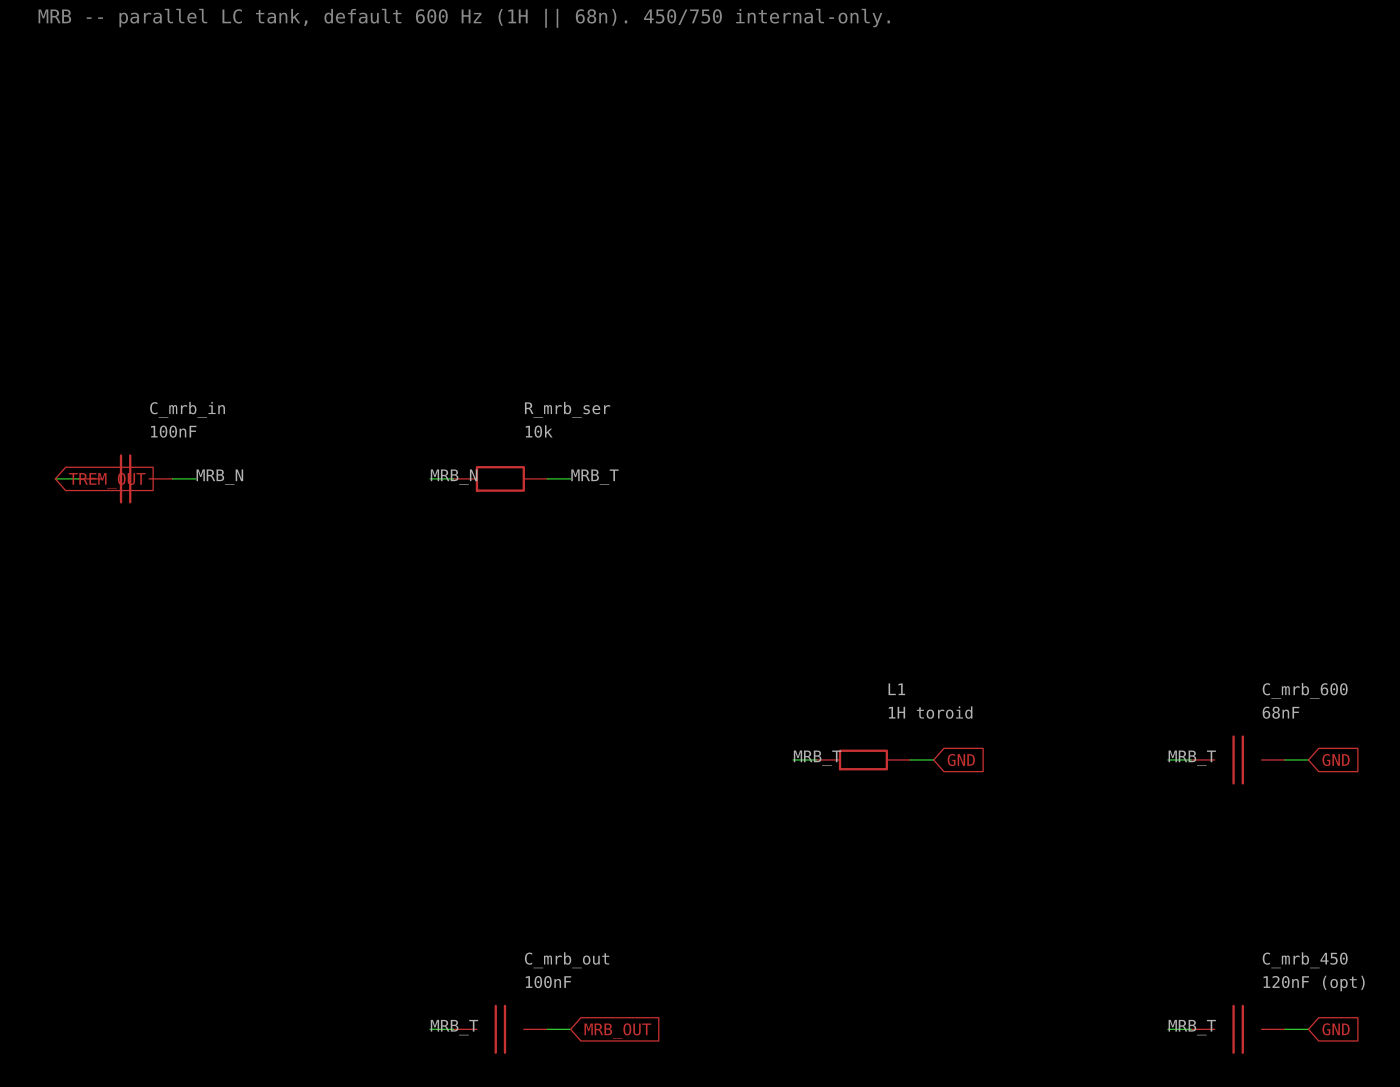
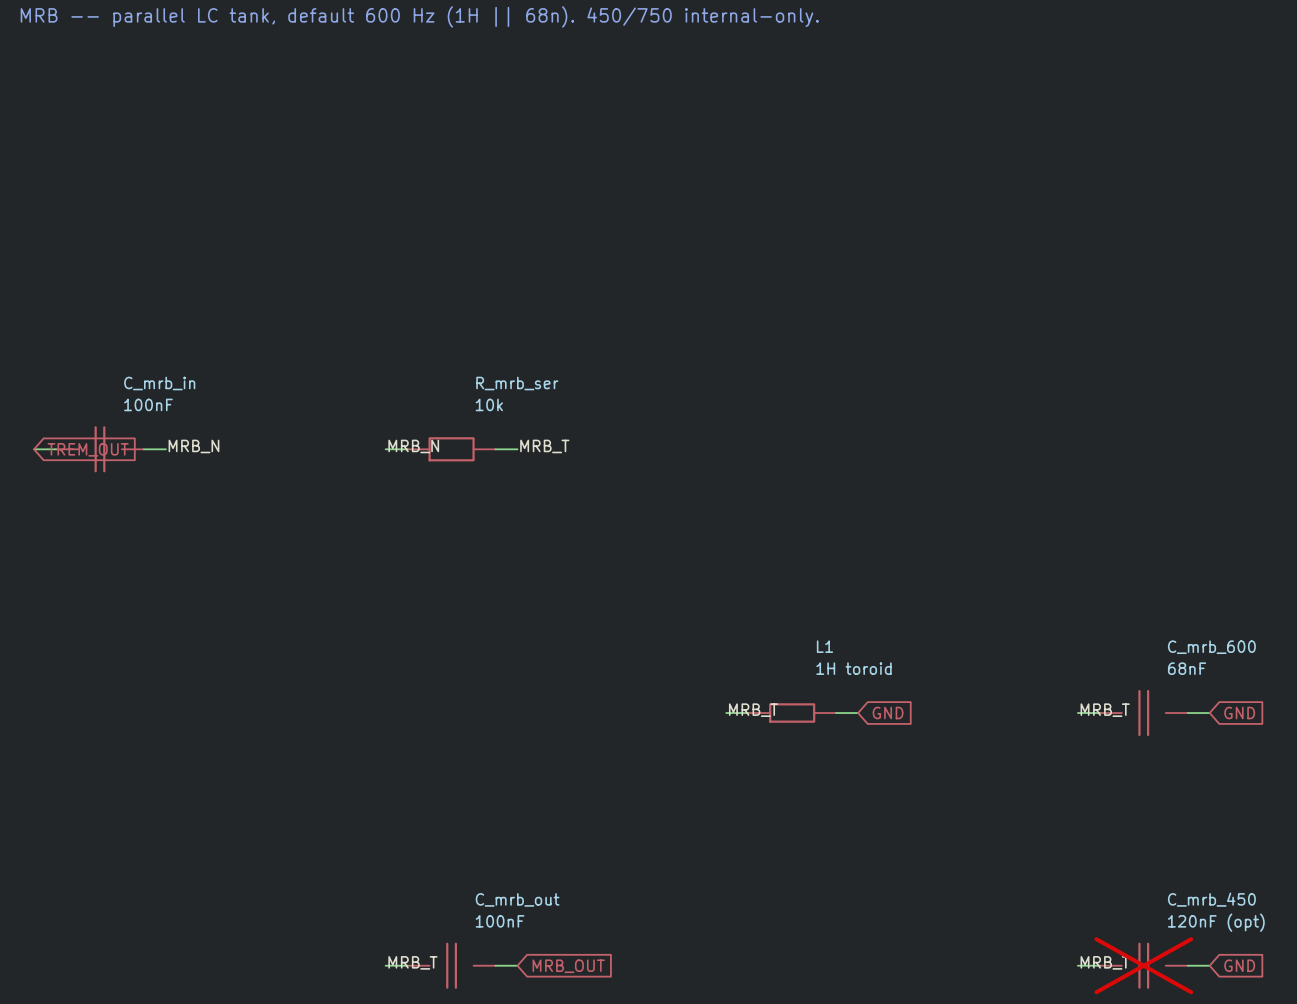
C_mrb_450 do-not-place cross: none -> (1143, 965)

